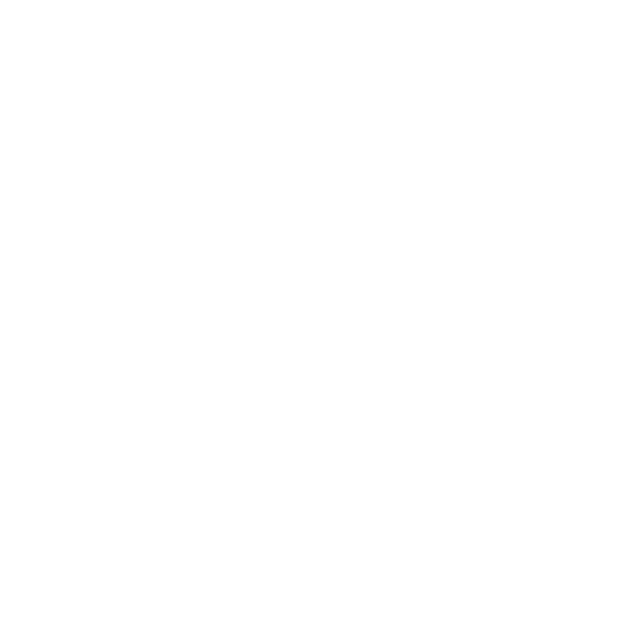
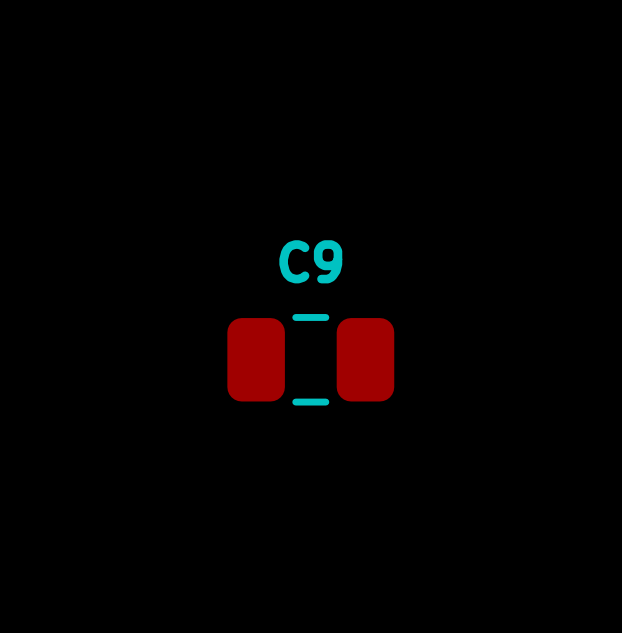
C9: none -> (310, 359)

